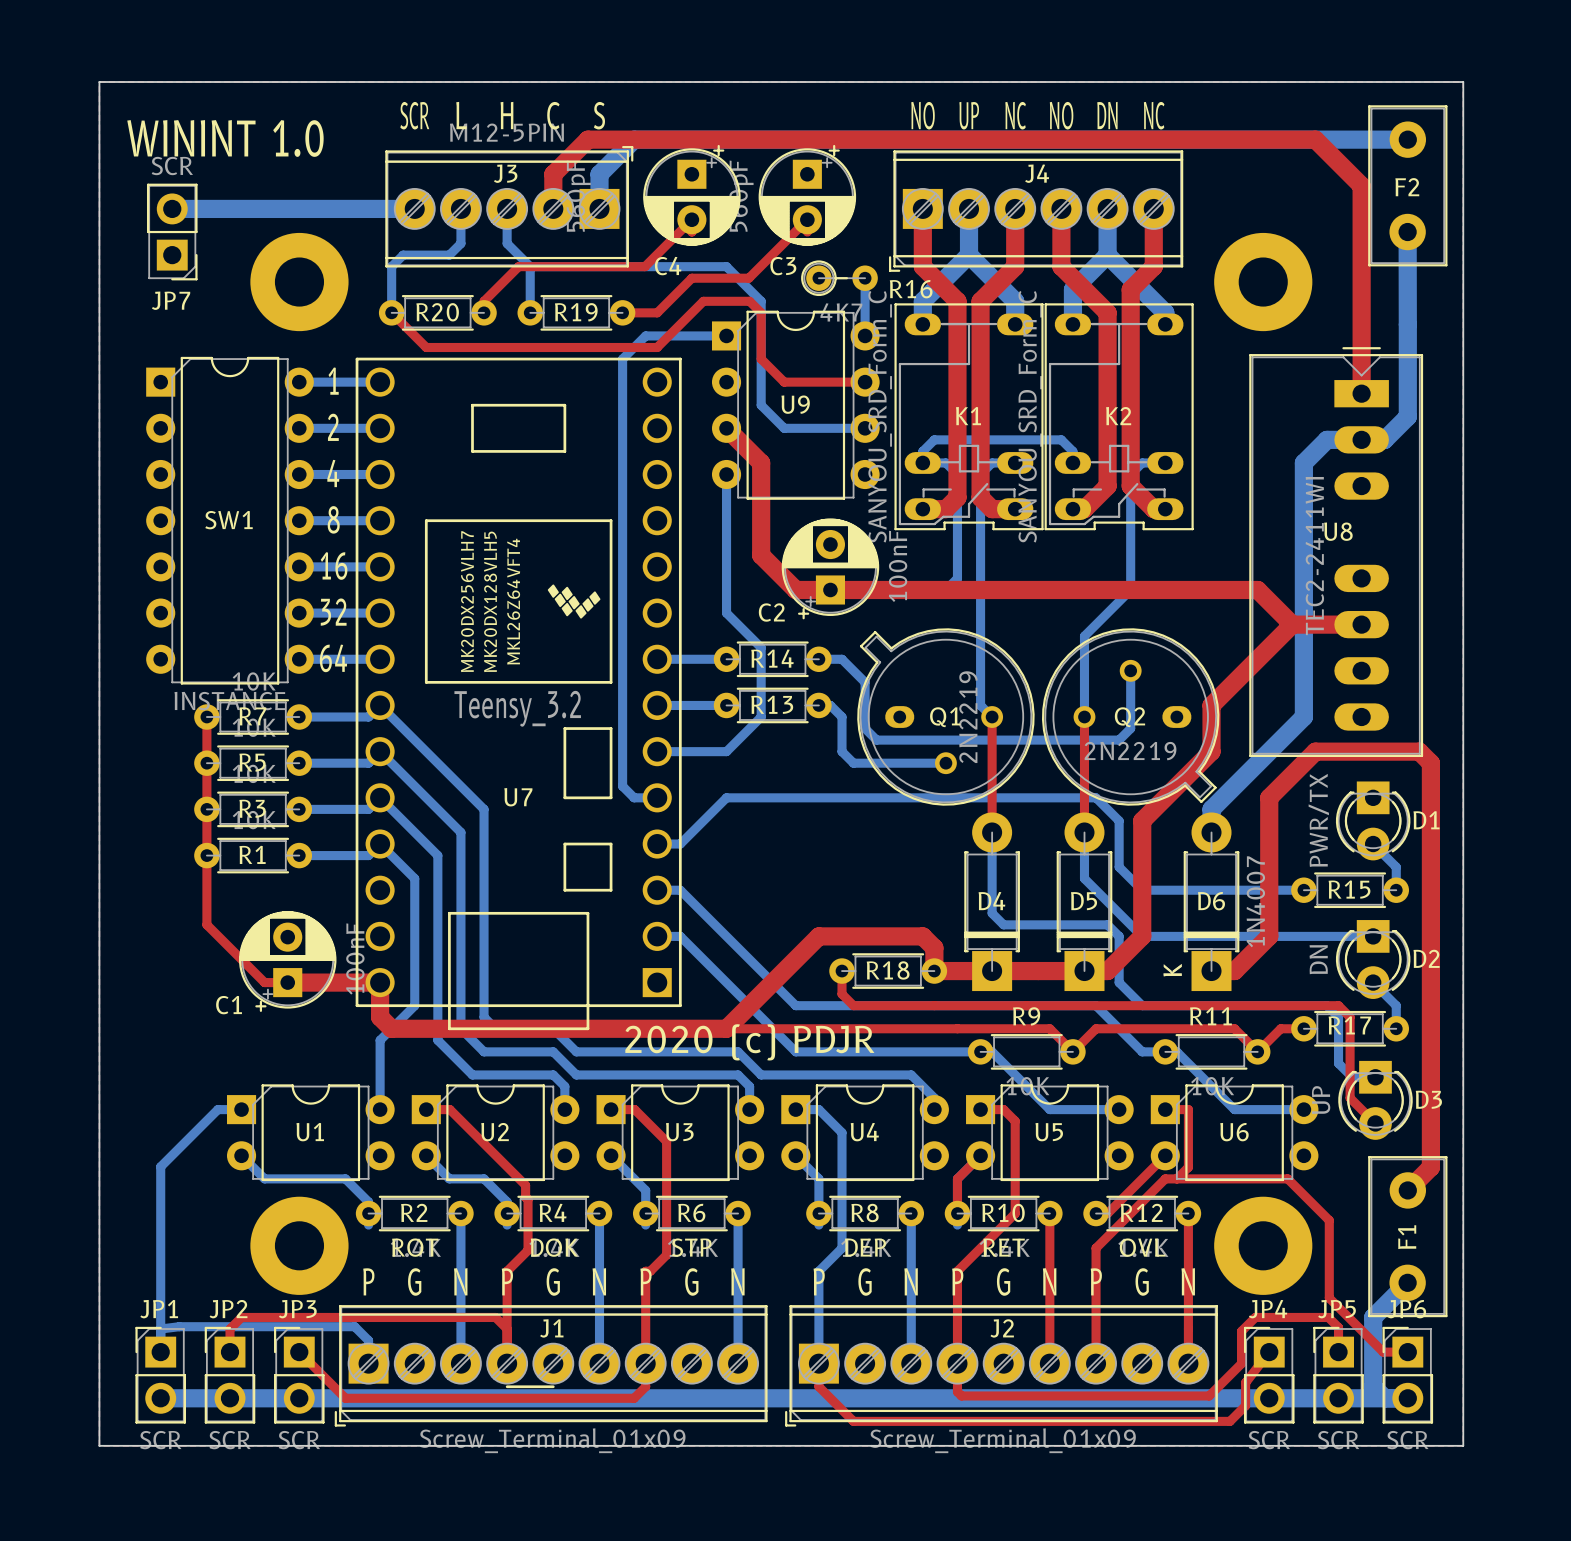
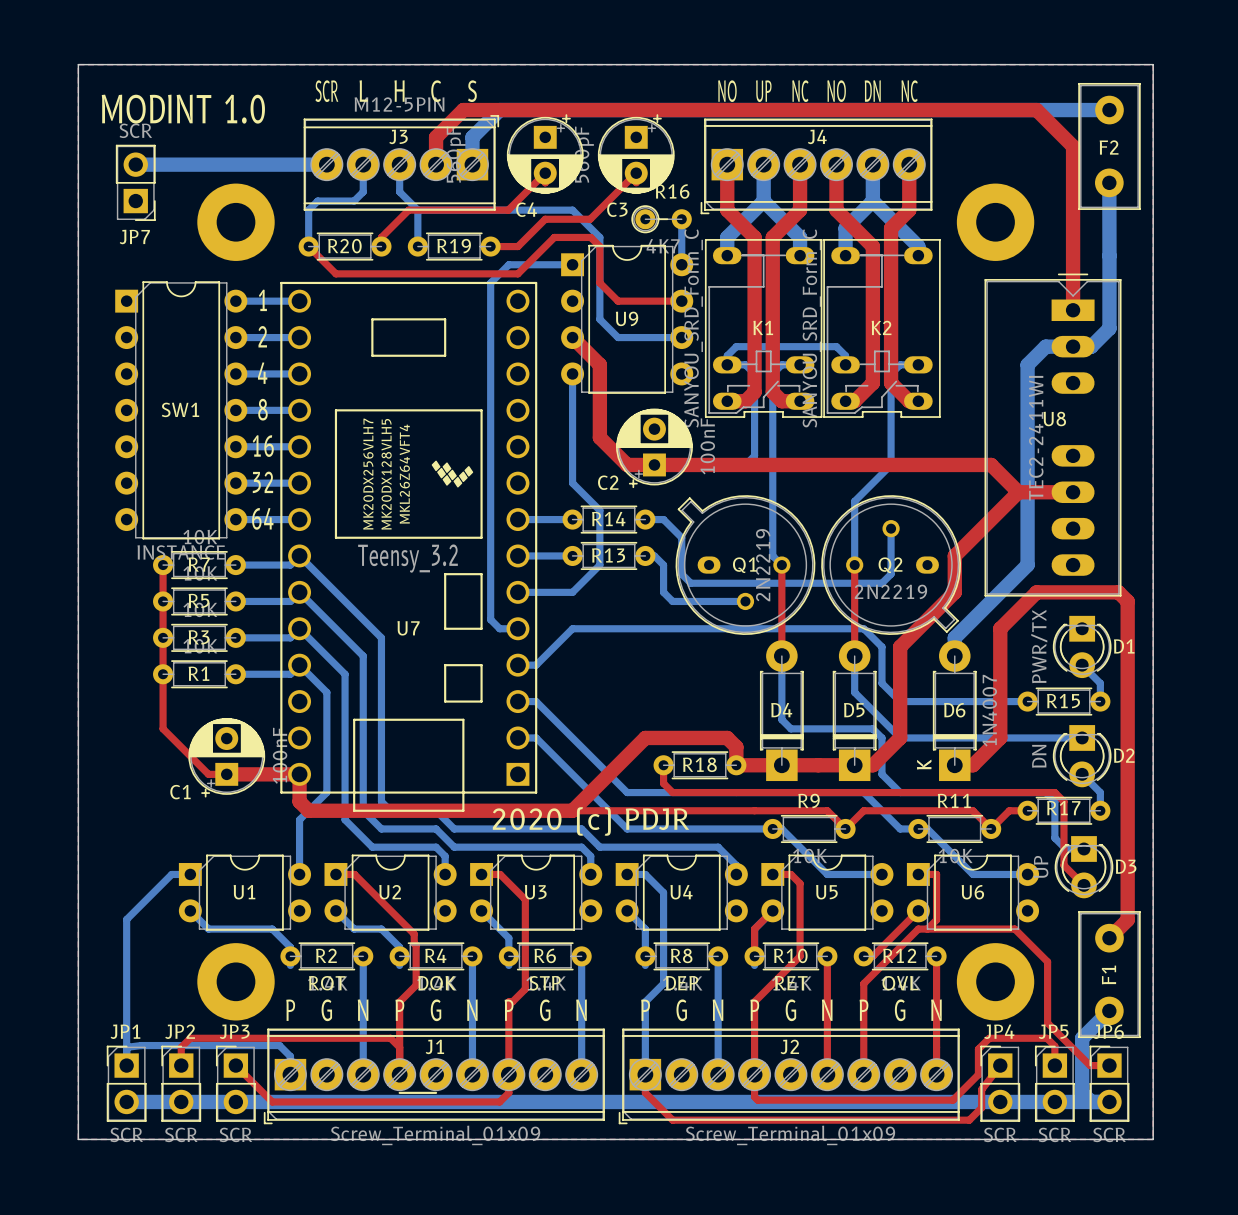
text: WININT 1.0 (225, 138) -> MODINT 1.0 (183, 109)
R16 name position: R16 (911, 289) -> R16 (672, 191)

